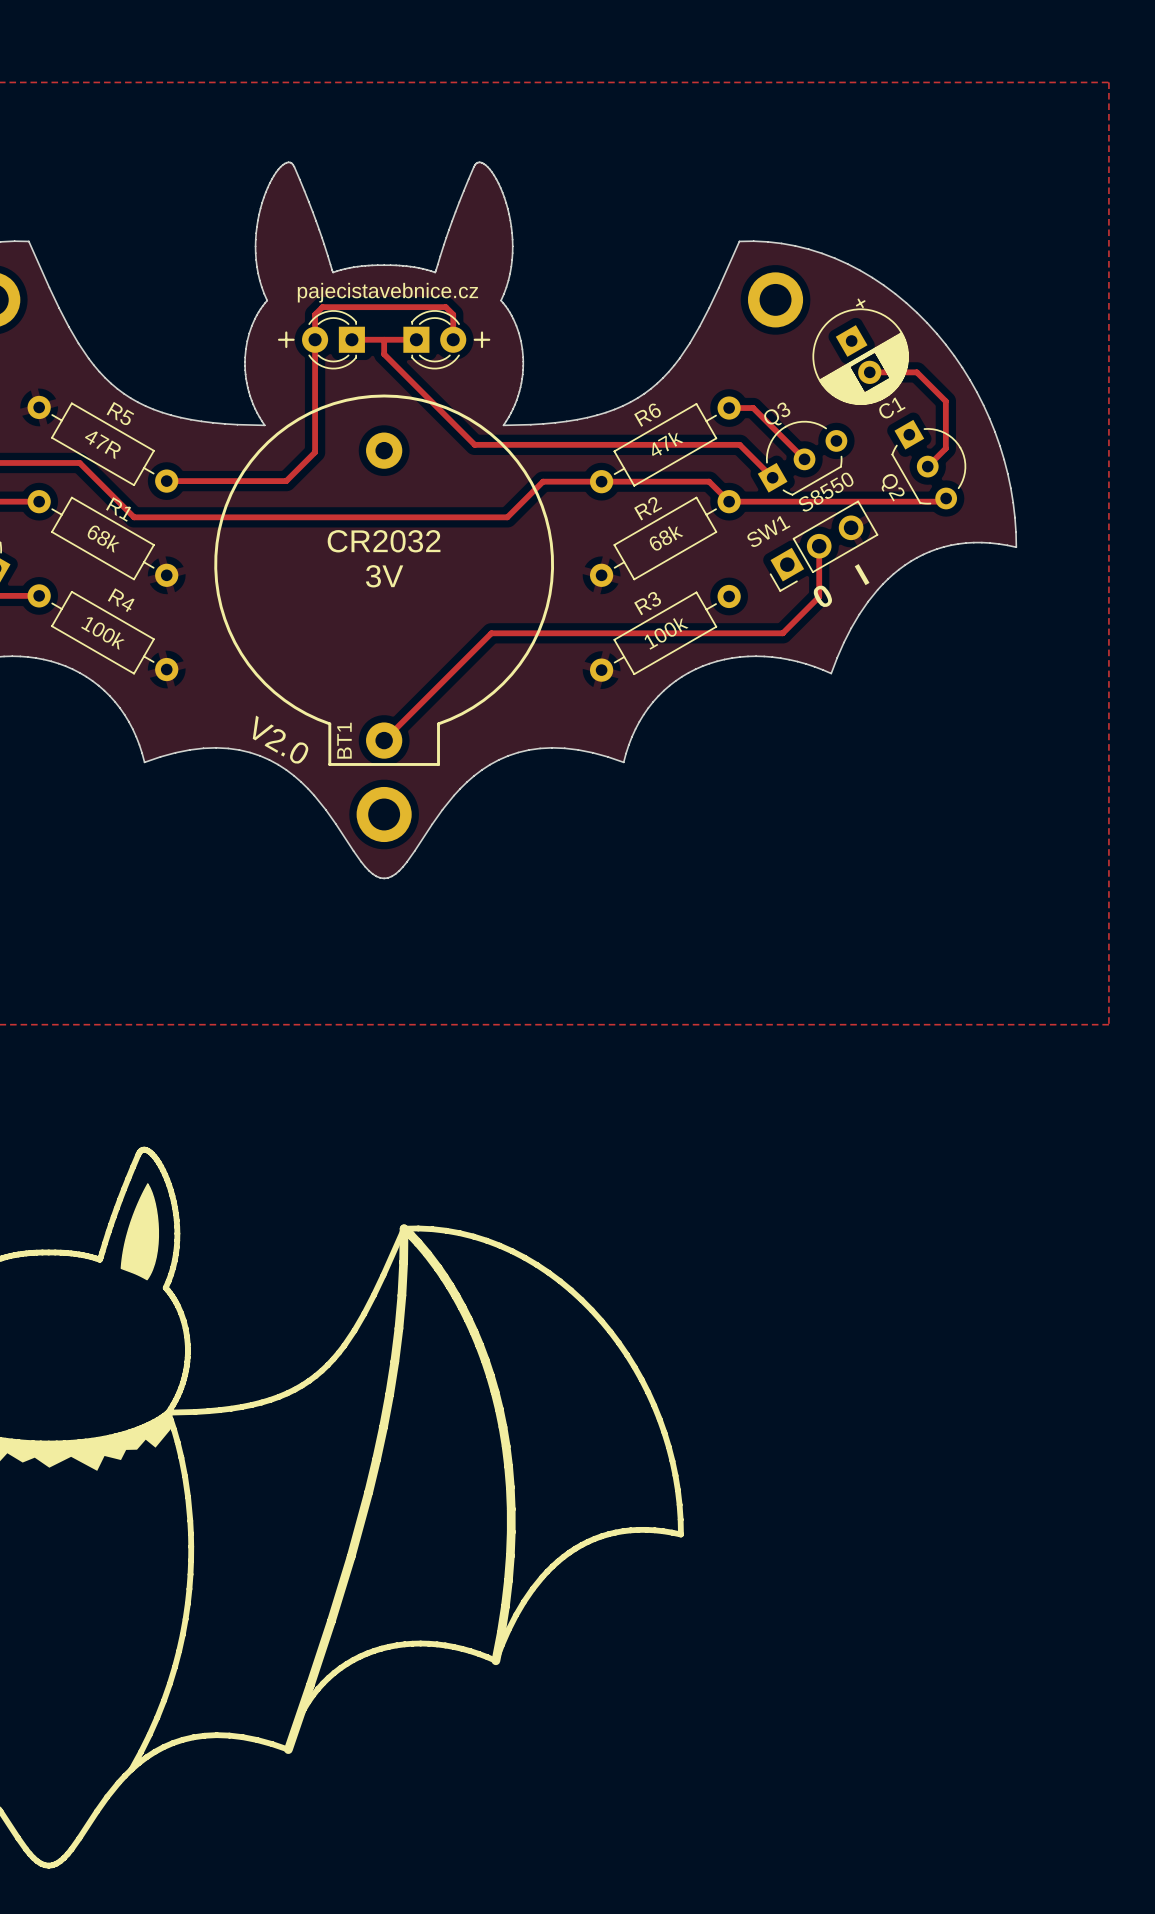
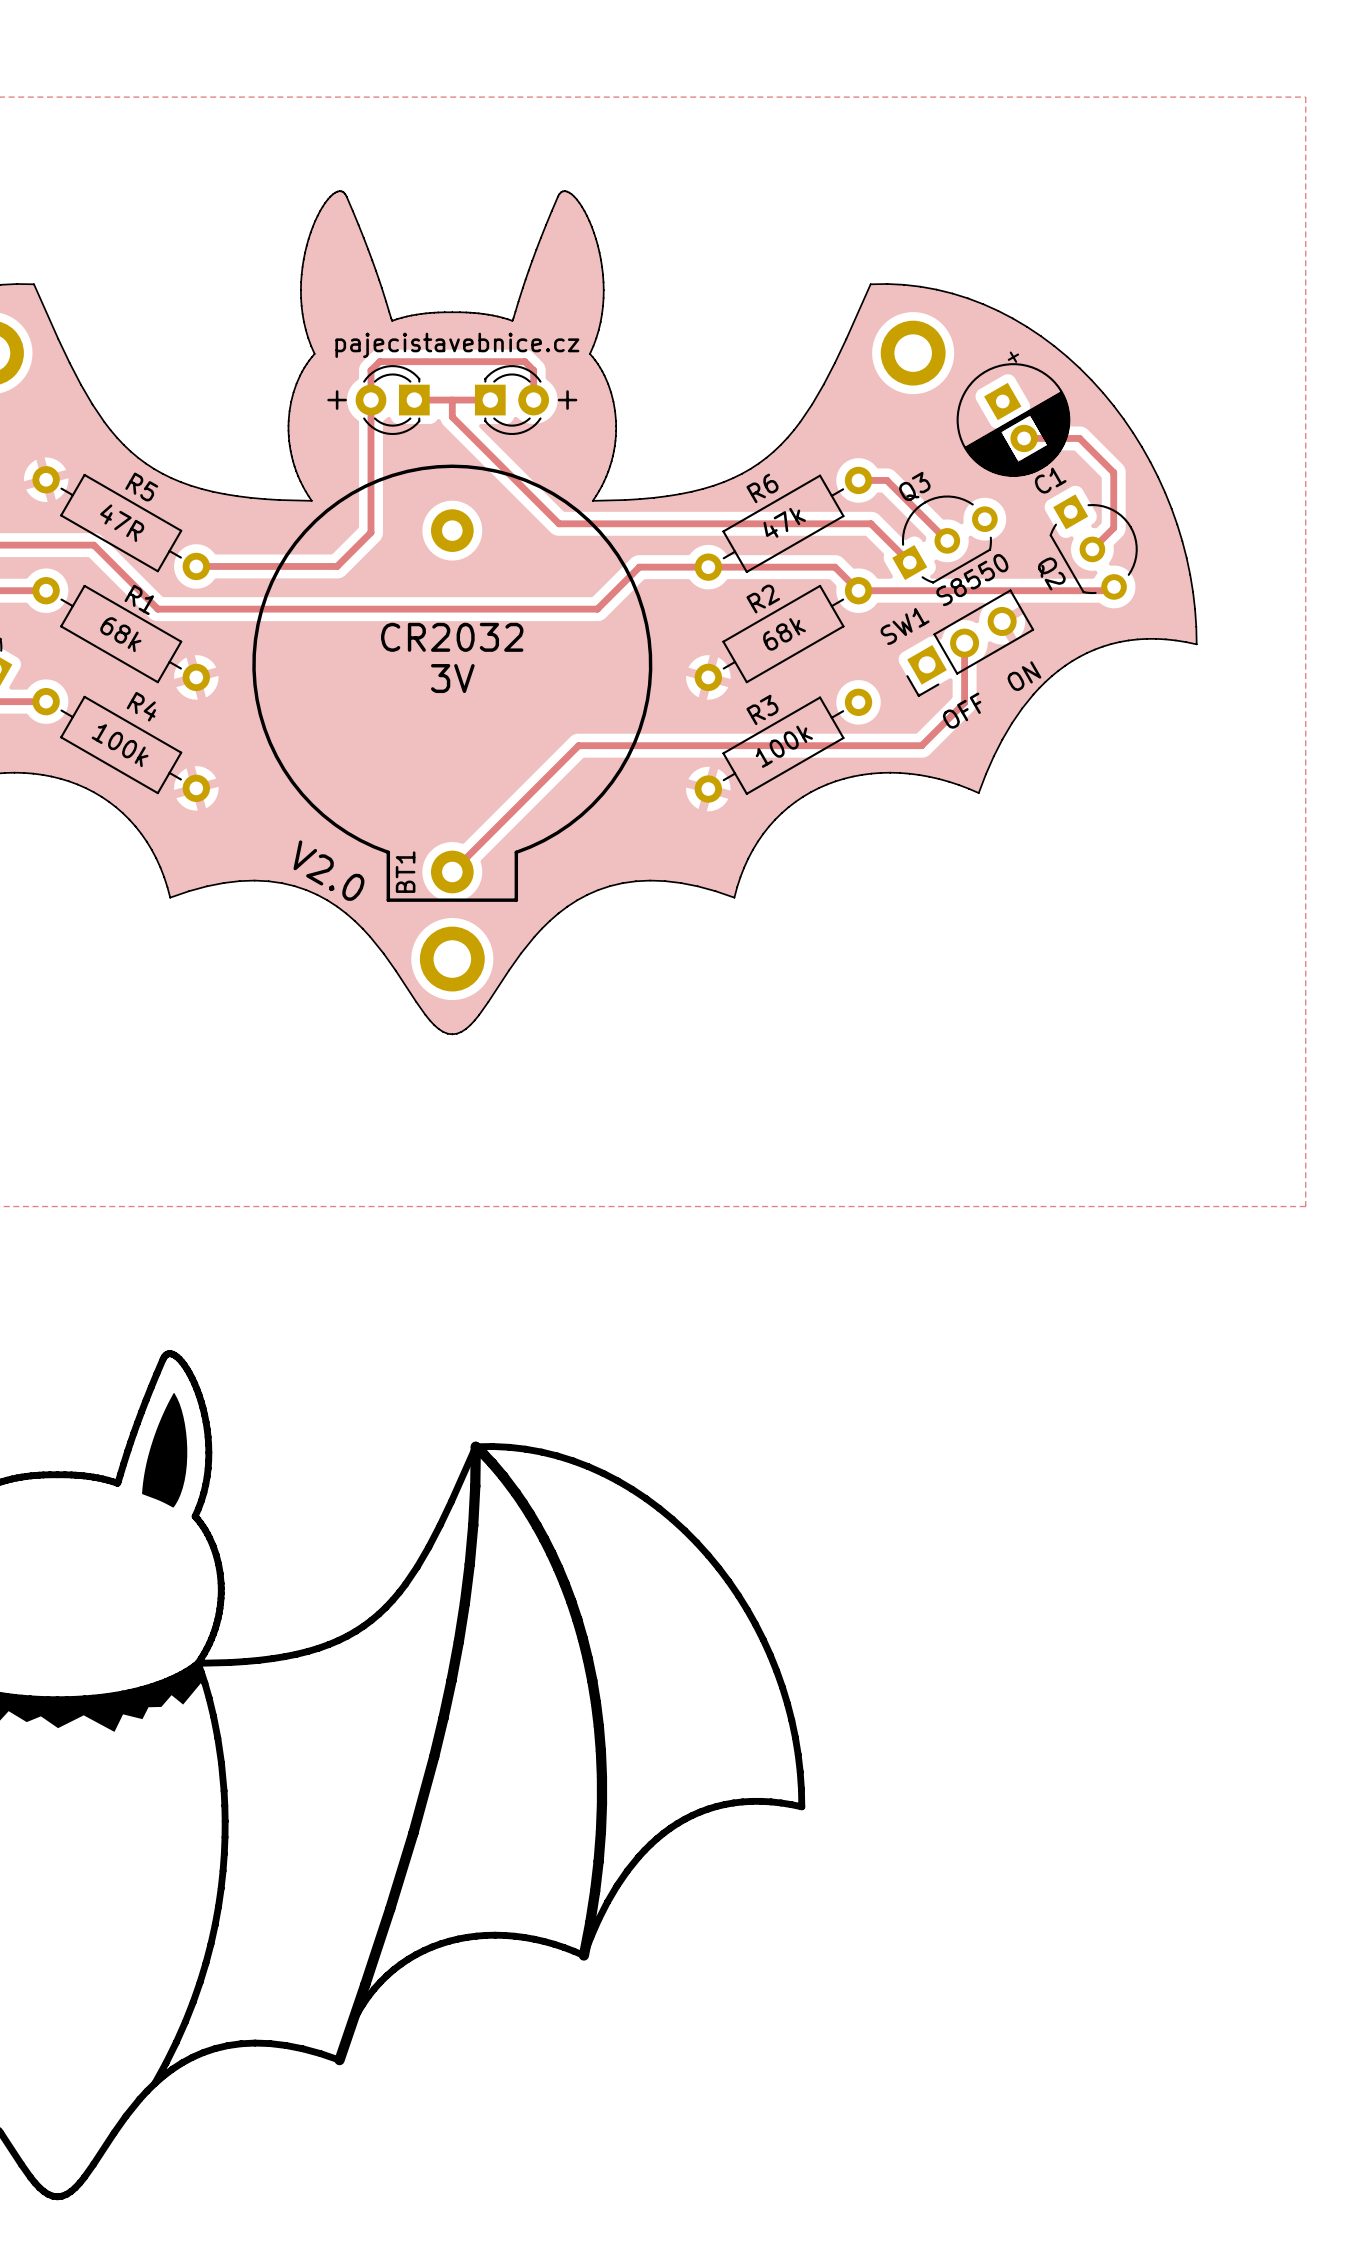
text: I (862, 574) -> ON (1024, 676)
text: 0 (822, 597) -> OFF (962, 710)

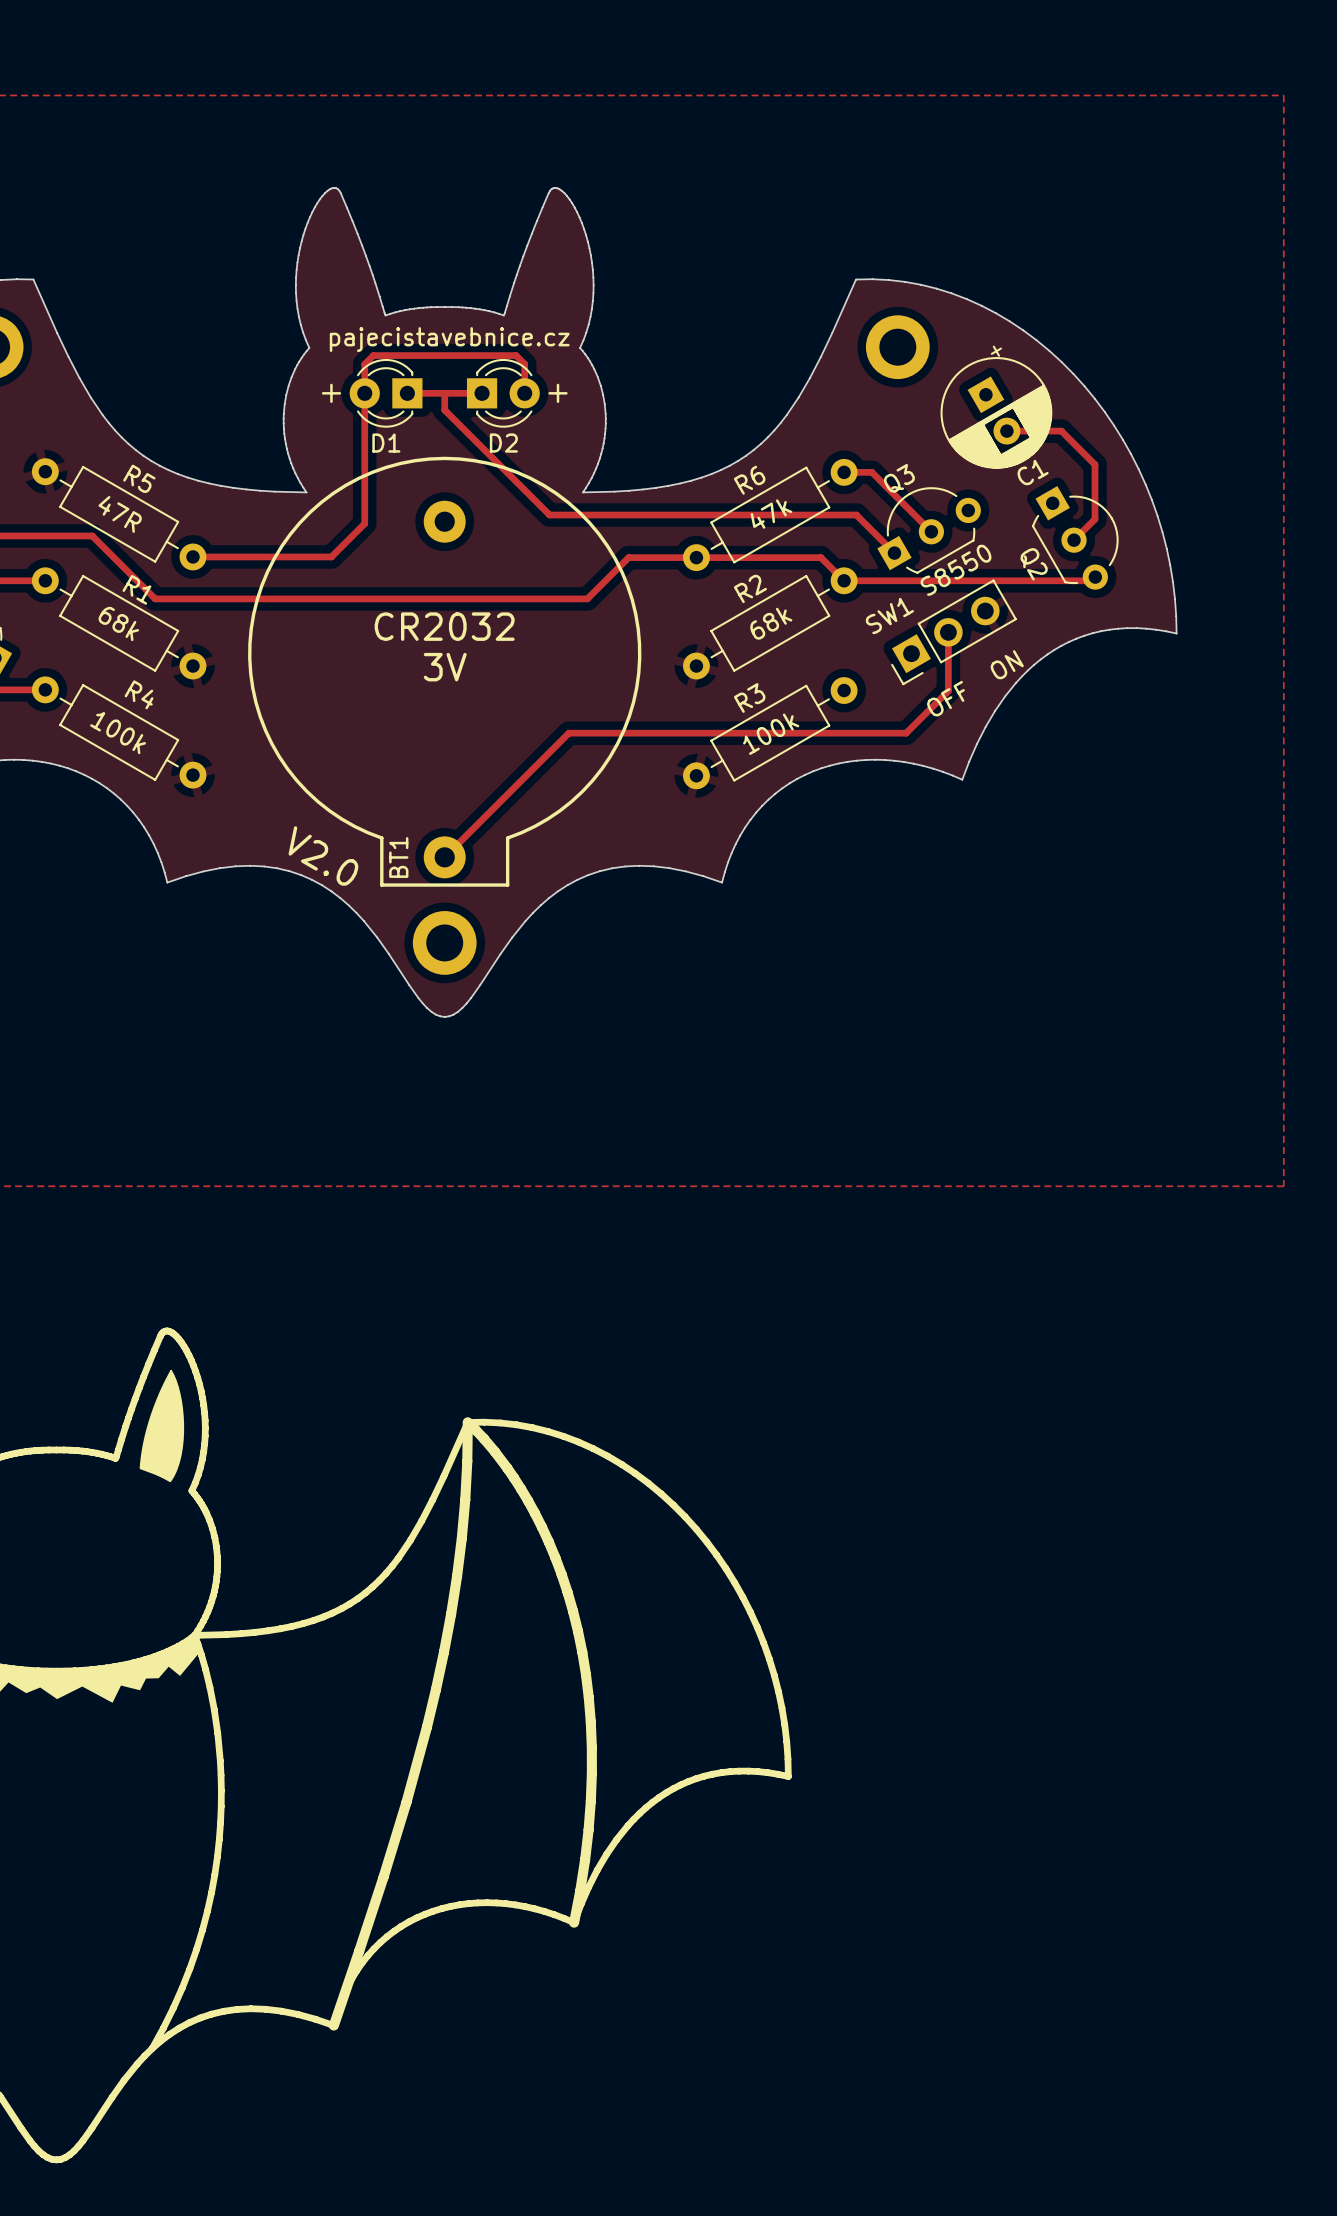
D1 name: none -> D1 (386, 443)
D2 name: none -> D2 (503, 443)

